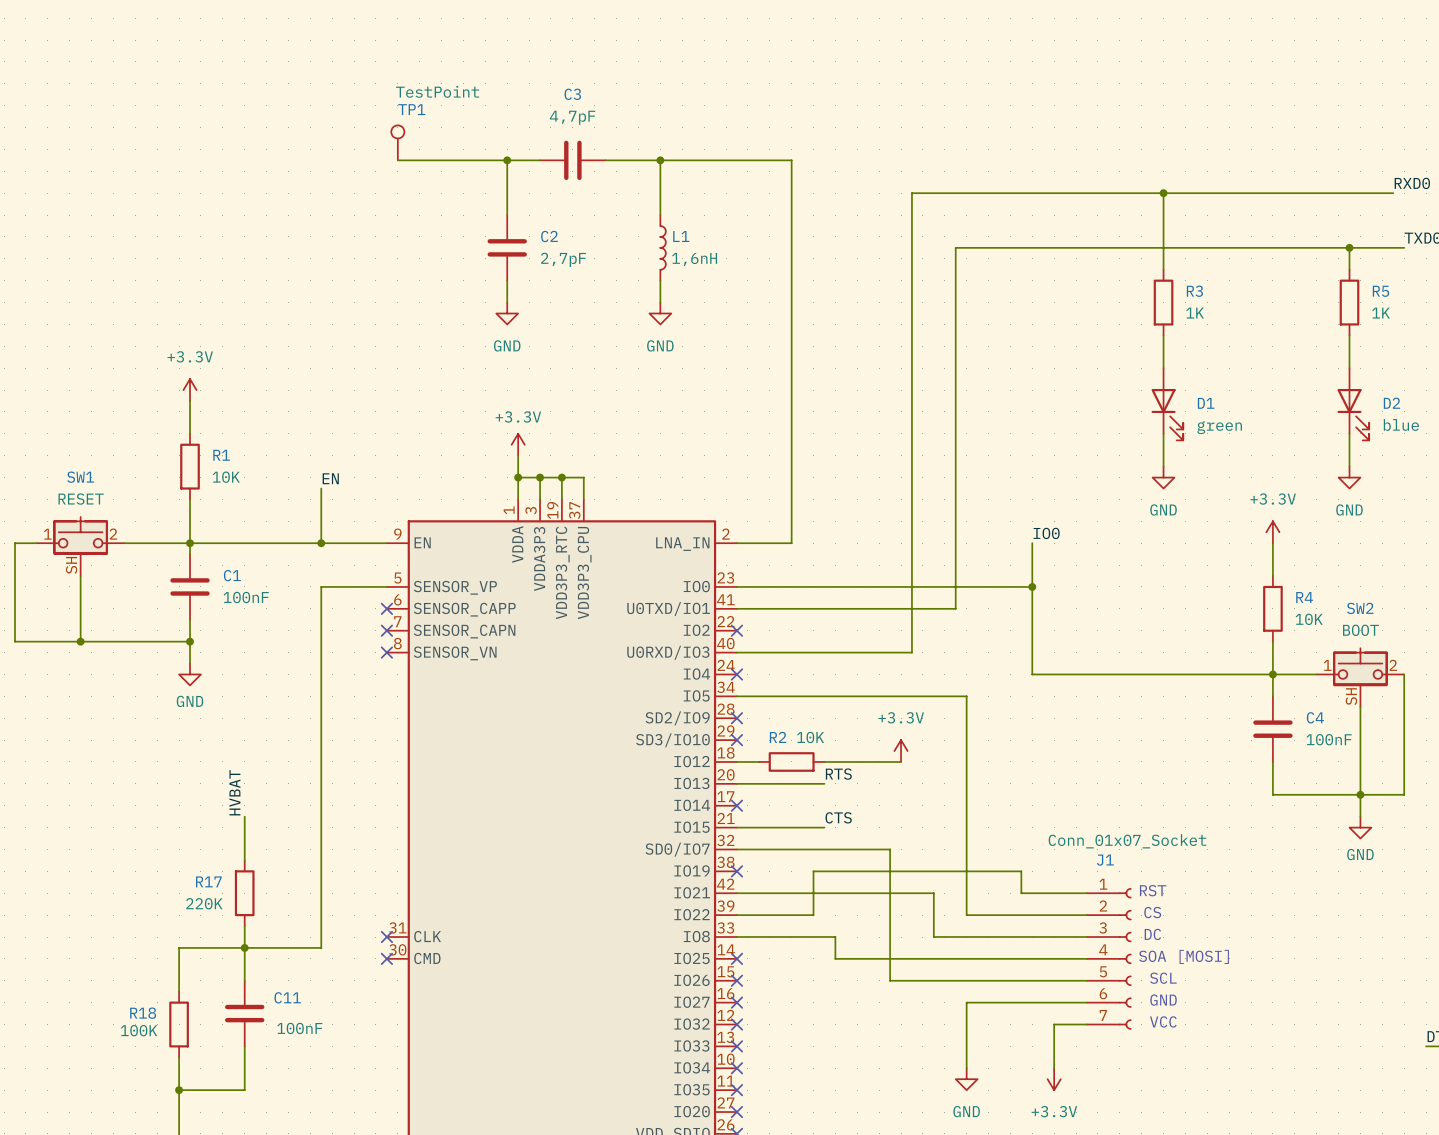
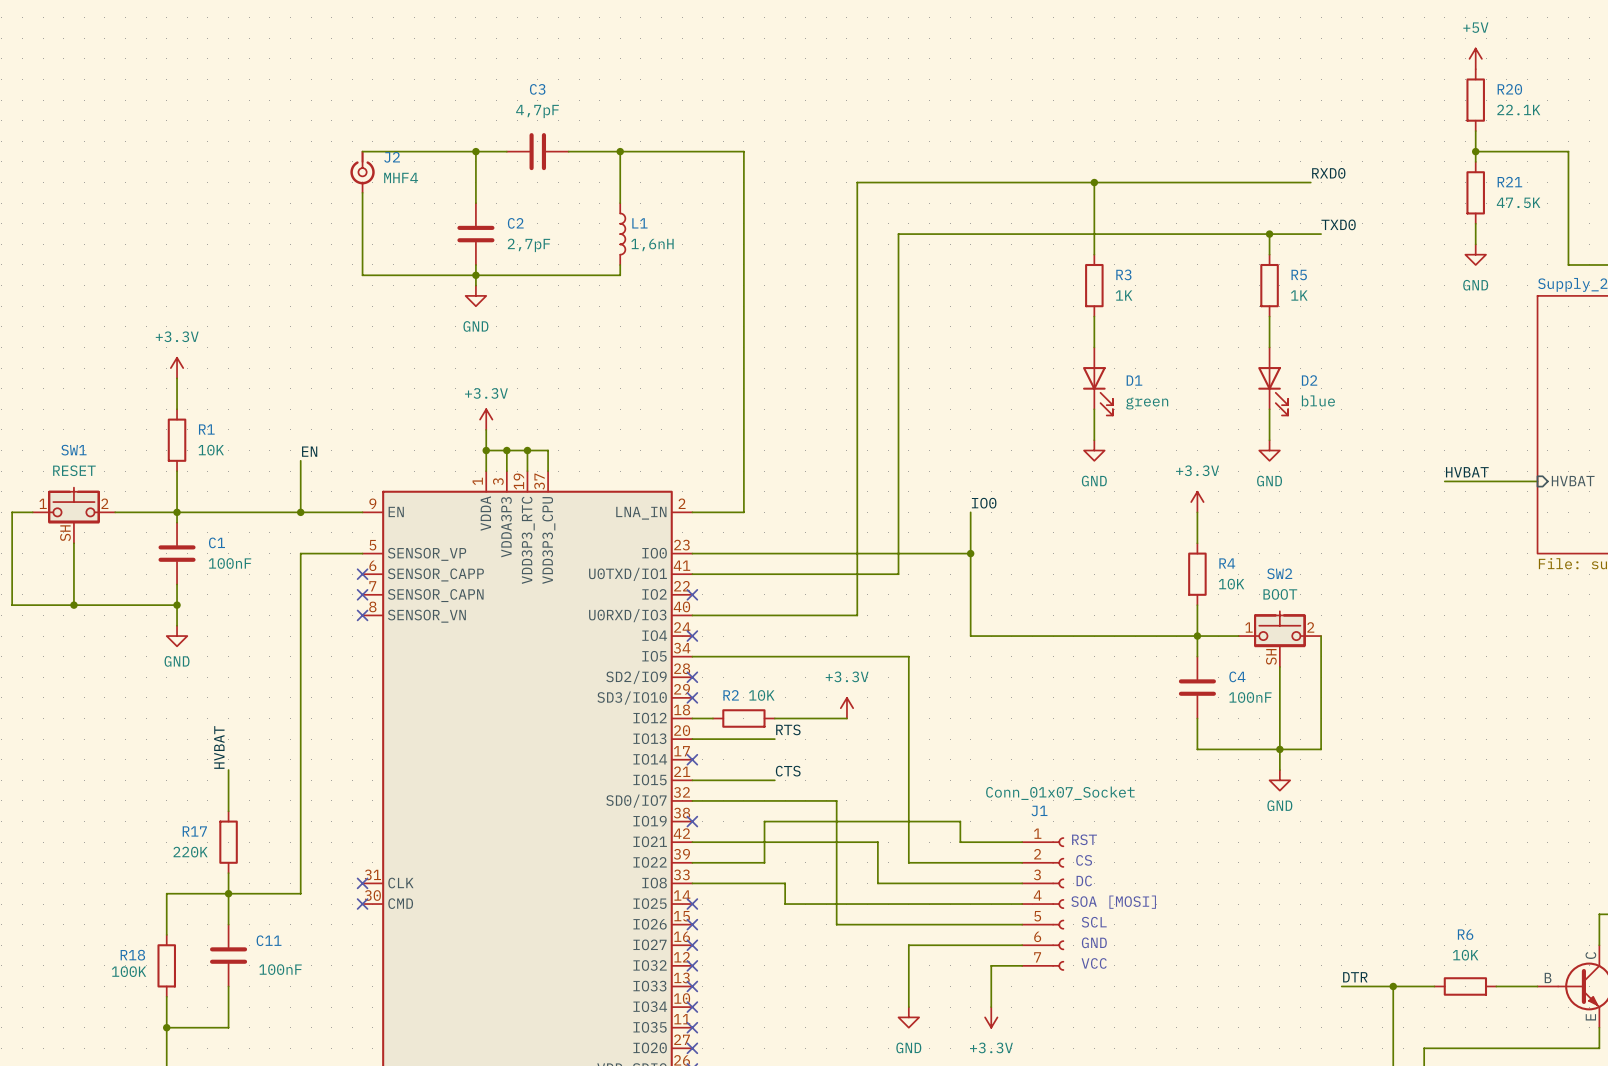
TP1: TestPoint (397, 142) -> none
wire: none -> (362, 151) (372, 151)
J2: none -> MHF4 (362, 172)
junction: none -> (475, 275)
wire: (660, 291) (660, 302) -> (620, 275) (362, 275) (362, 192)
power symbol: GND (660, 313) -> none

